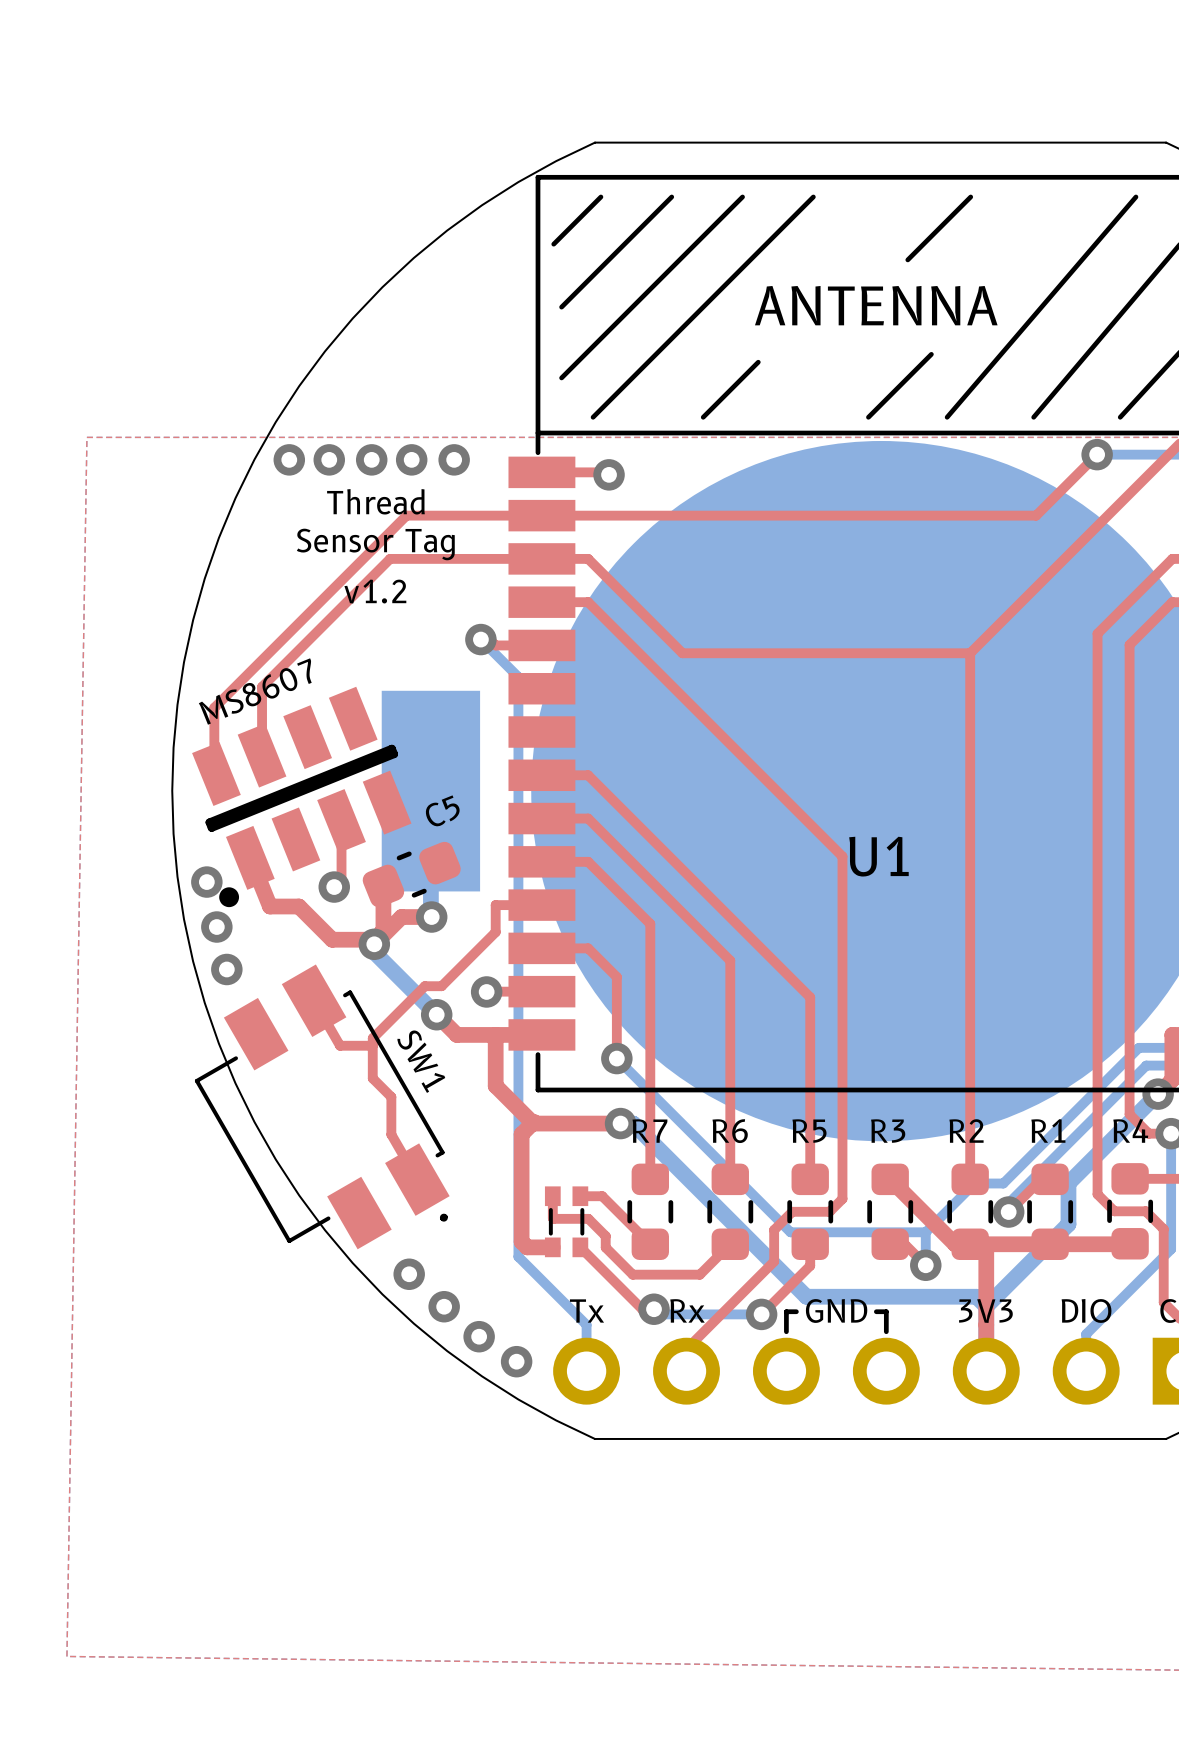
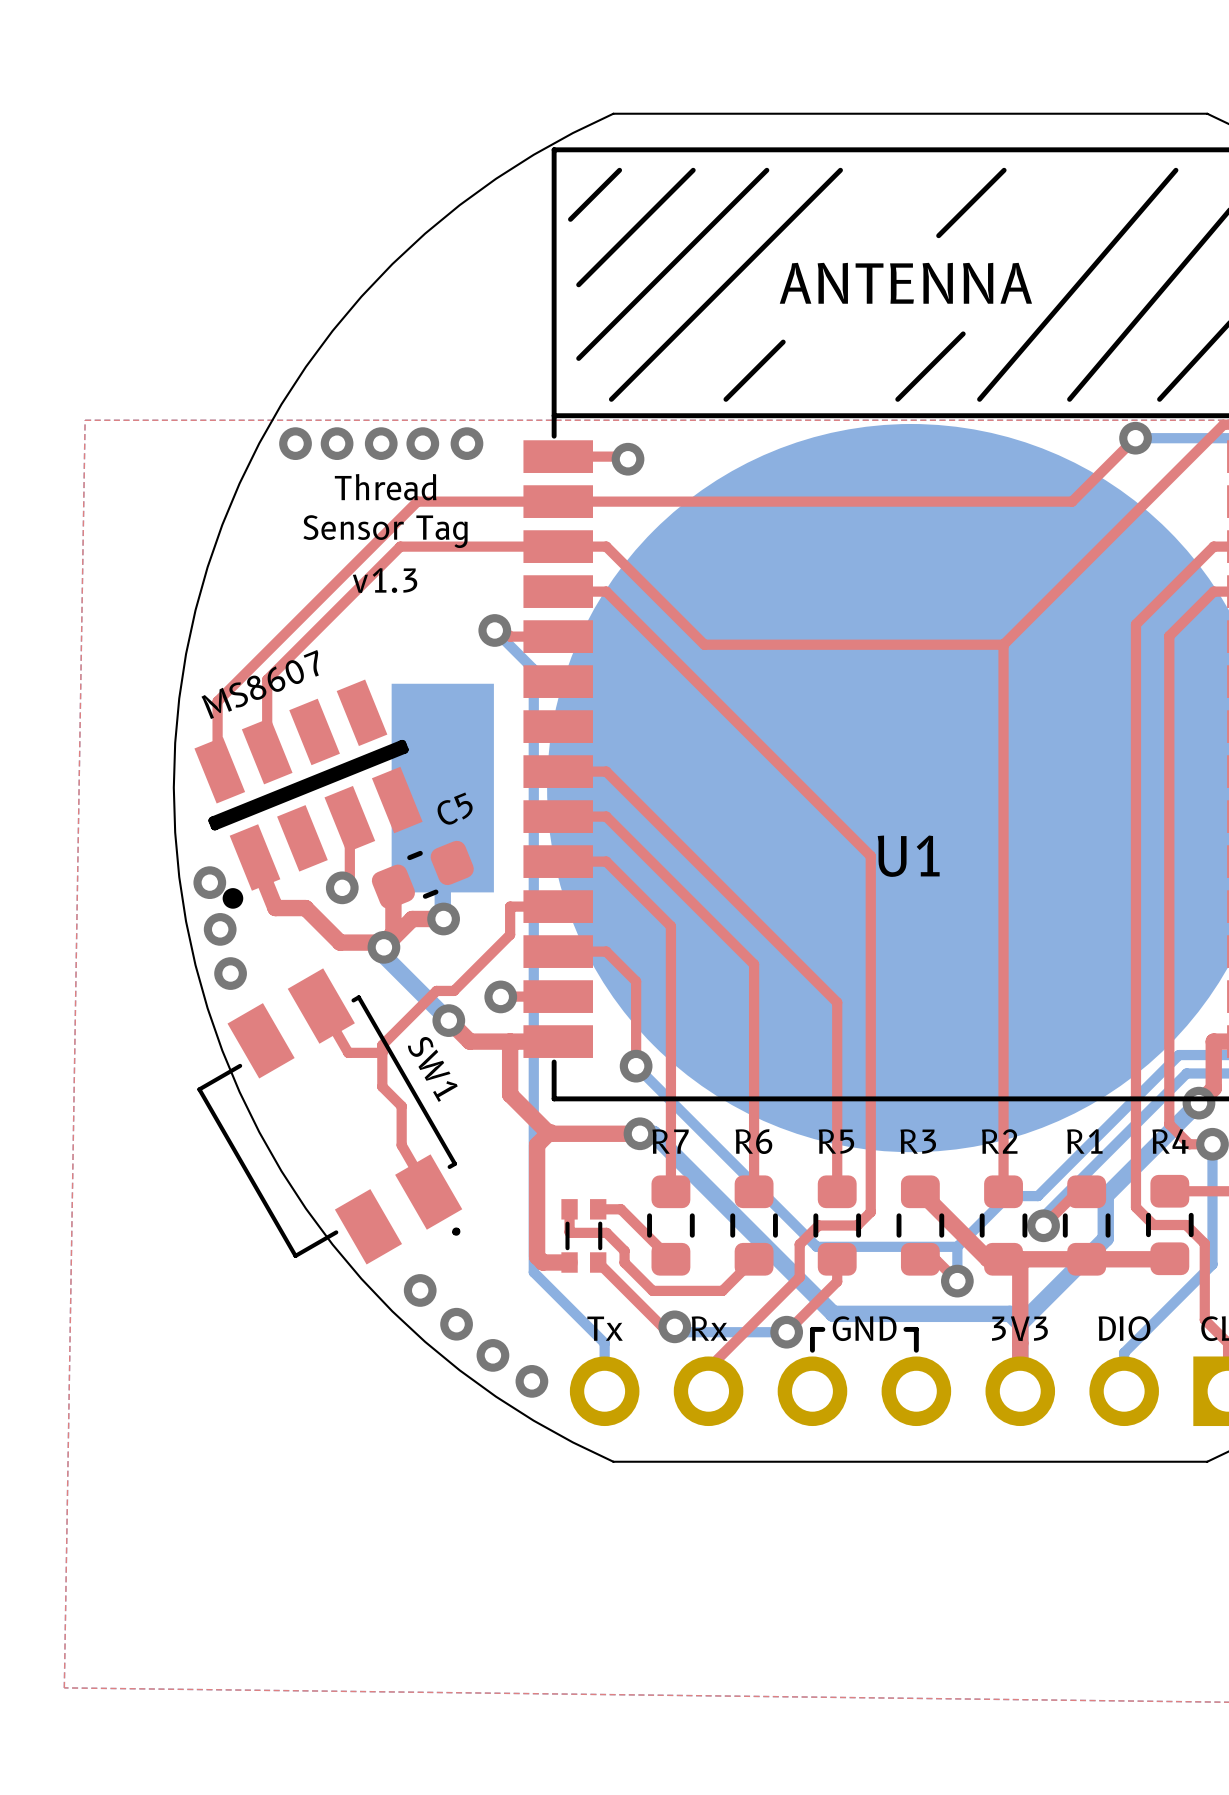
text: v1.2 (375, 591) -> v1.3 (385, 580)

